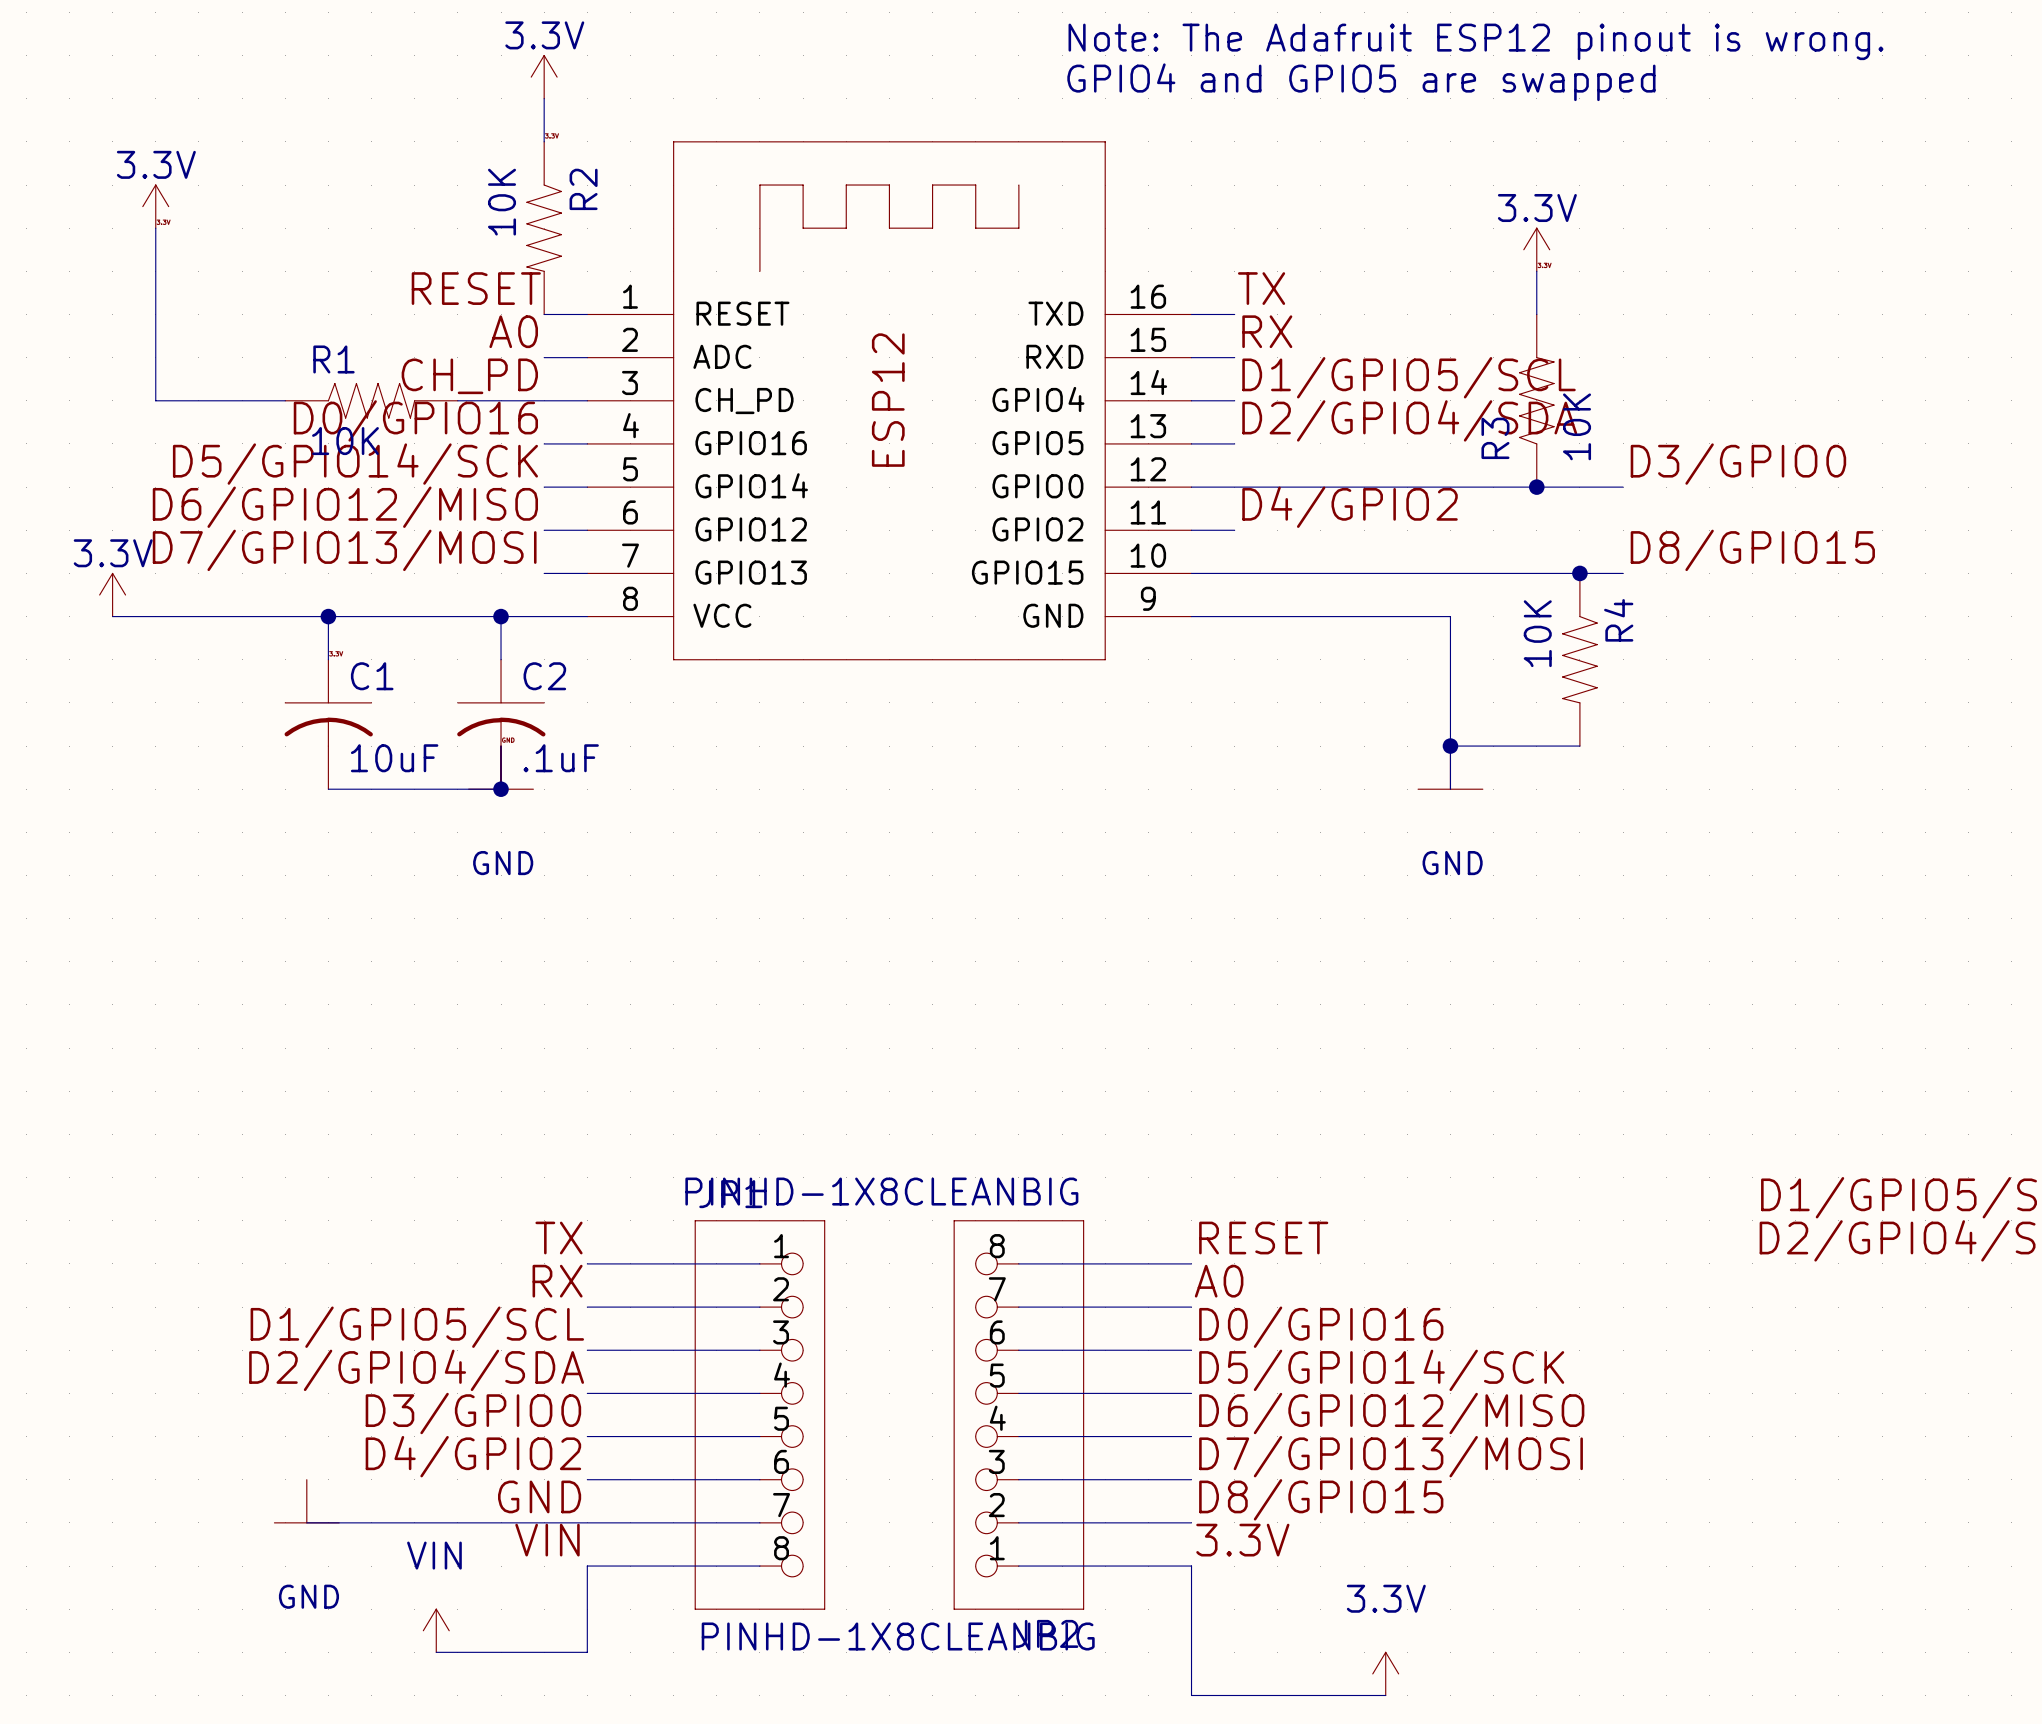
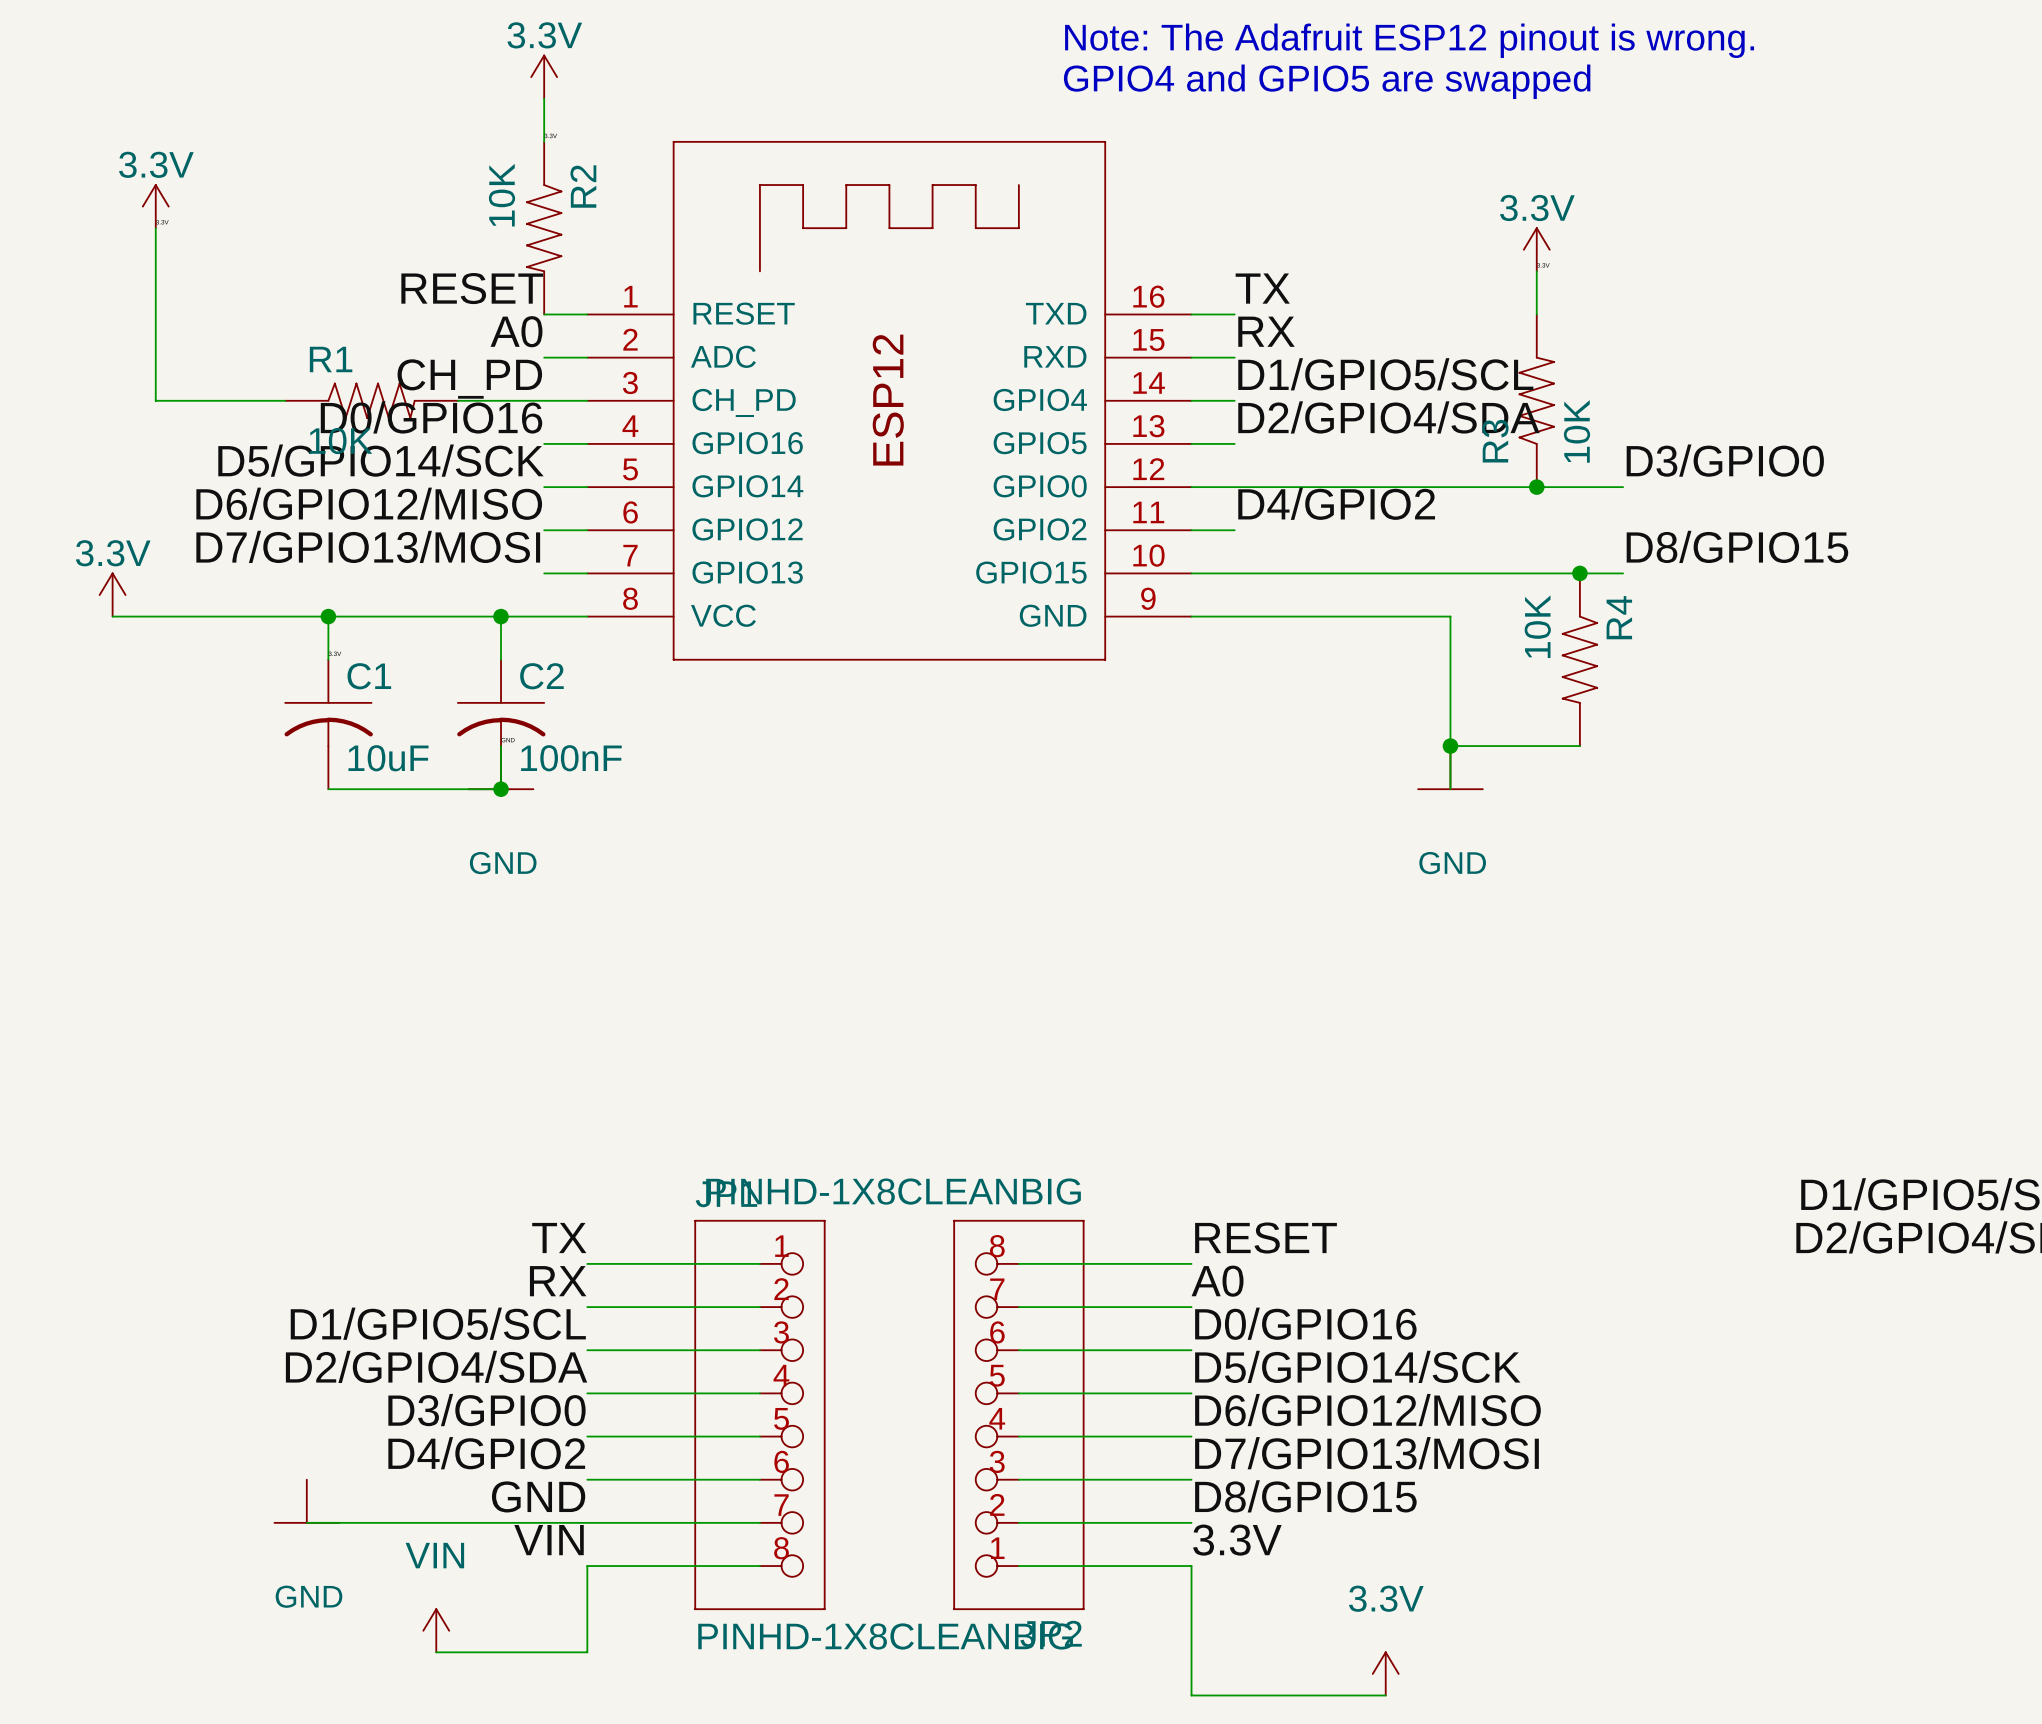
C2 value: .1uF (561, 758) -> 100nF (571, 758)

